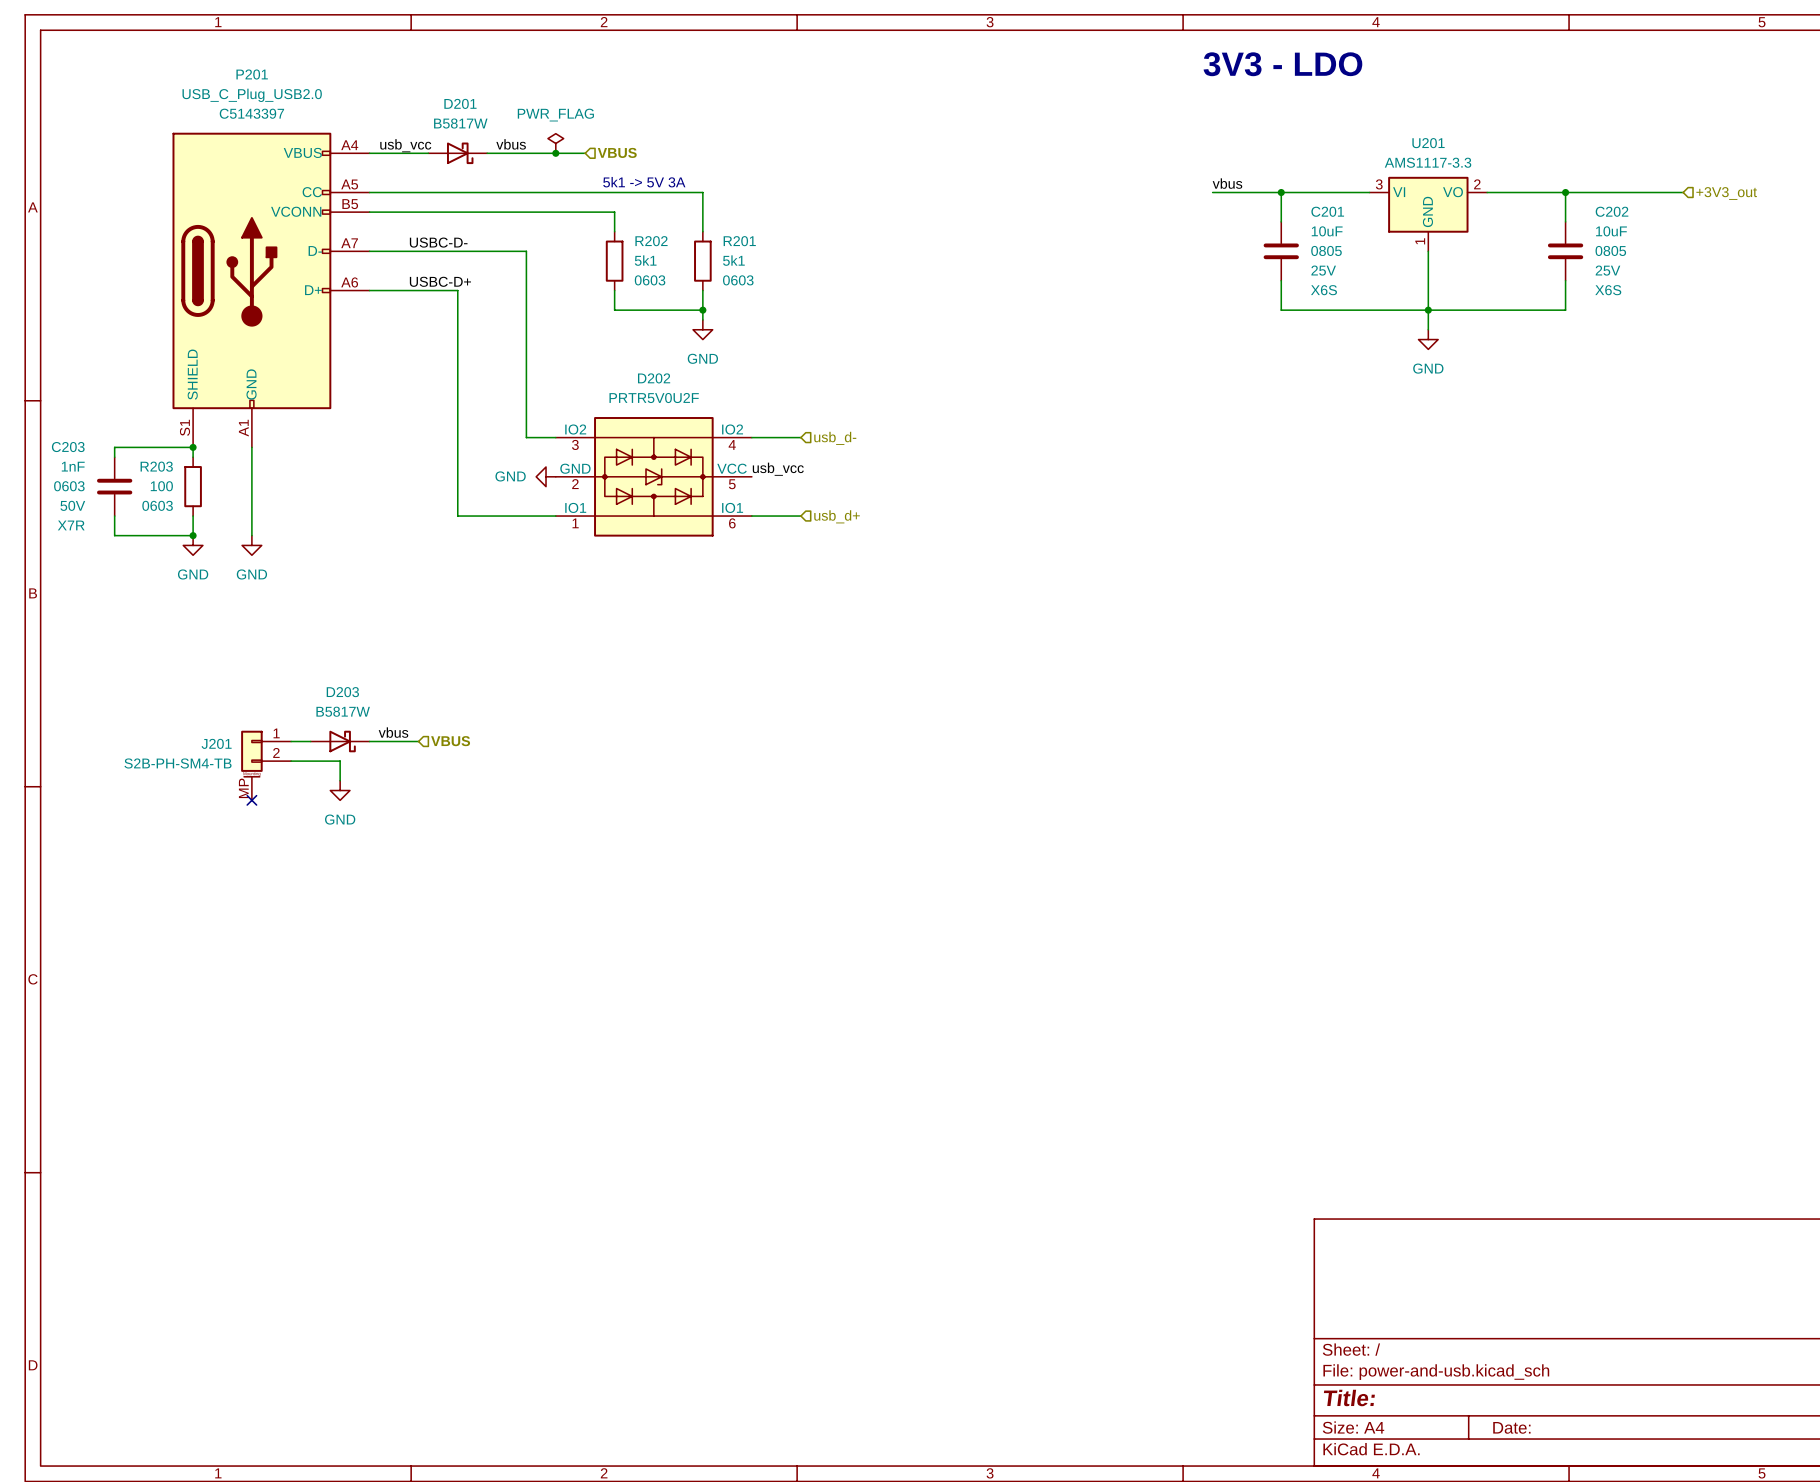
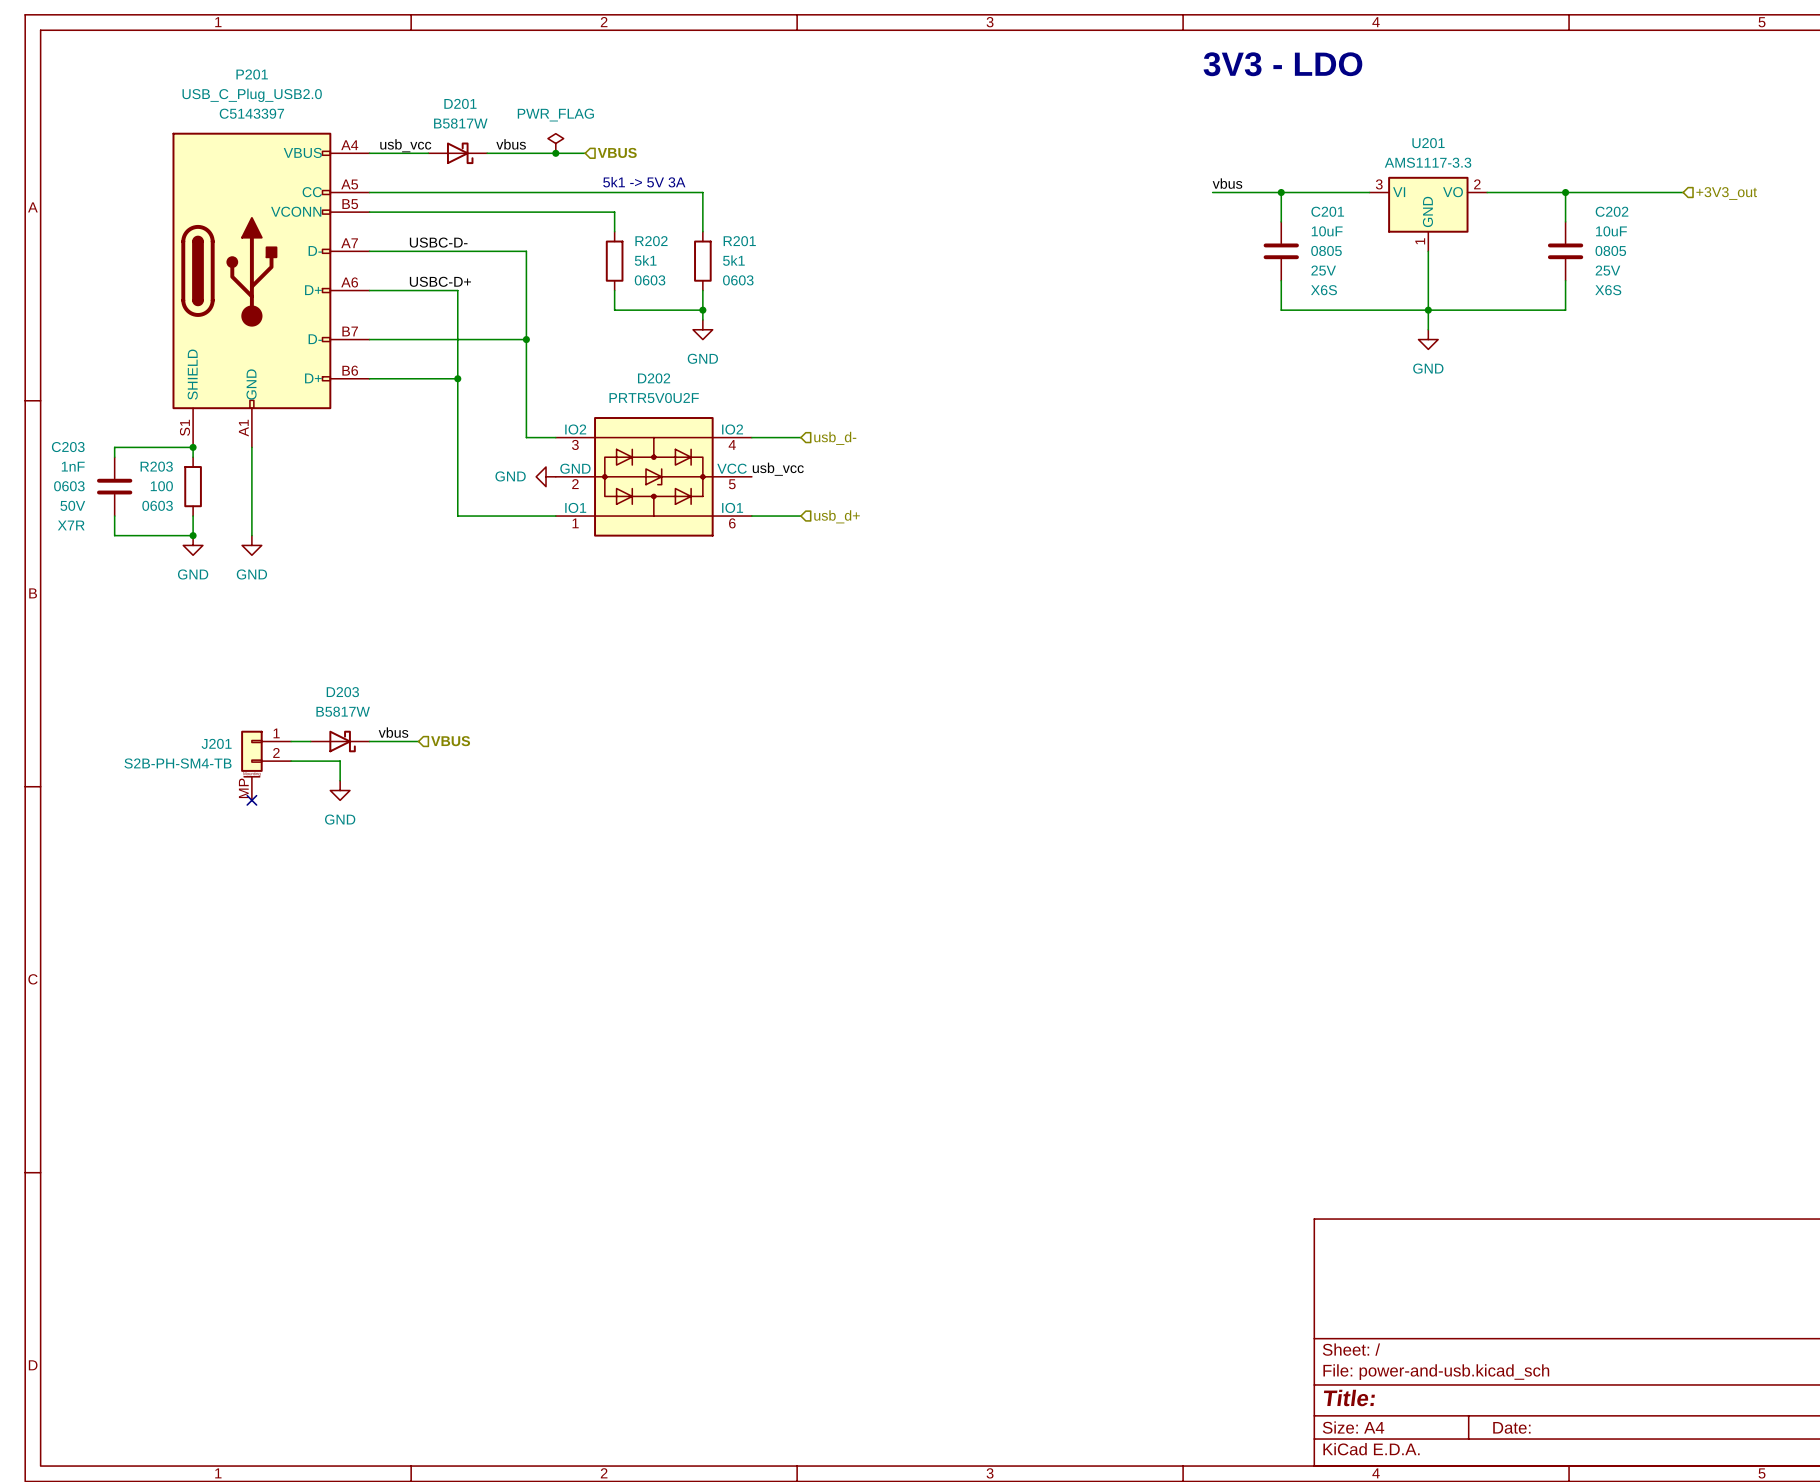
P201 symbol: [172, 132, 370, 448] -> [172, 132, 370, 448]
wire: none -> (369, 339) (526, 339)
junction: none -> (526, 339)
wire: none -> (369, 378) (457, 378)
junction: none -> (457, 378)

